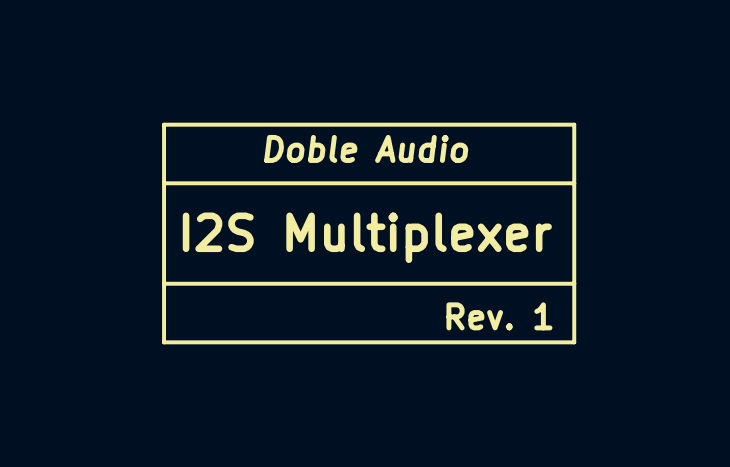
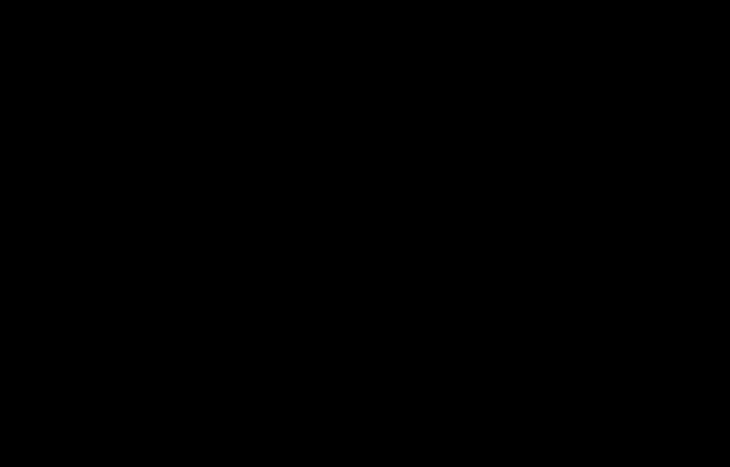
line: (164, 124) (164, 342) (574, 342) (574, 124) (164, 124) -> none
text: Doble Audio (366, 148) -> none
line: (164, 183) (574, 183) -> none
text: I2S Multiplexer (367, 237) -> none
line: (164, 283) (574, 283) -> none
text: Rev. 1 (499, 316) -> none

